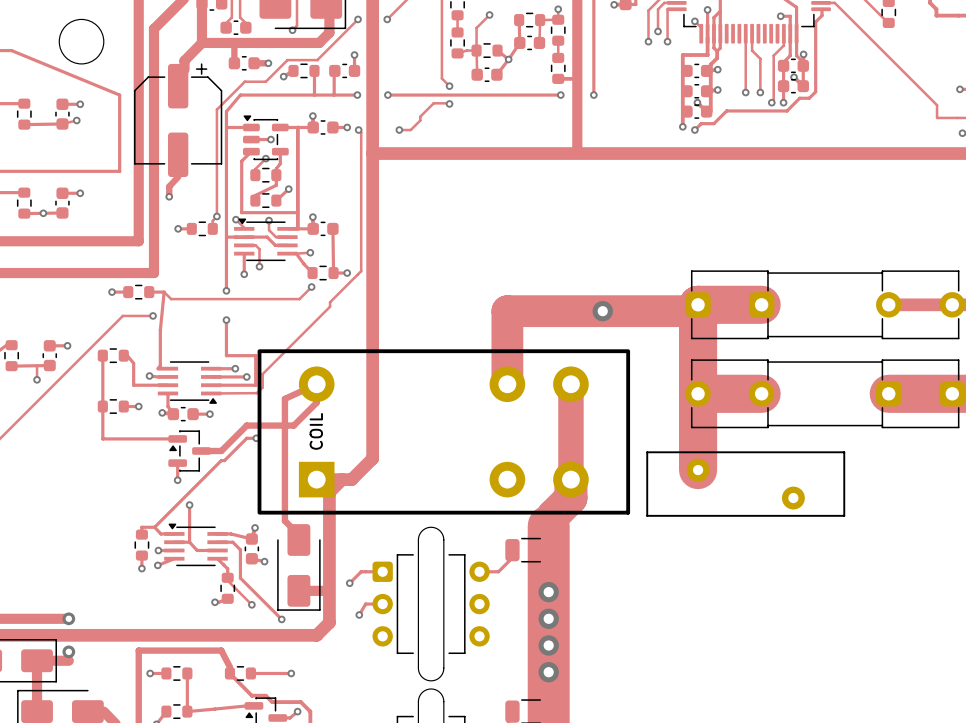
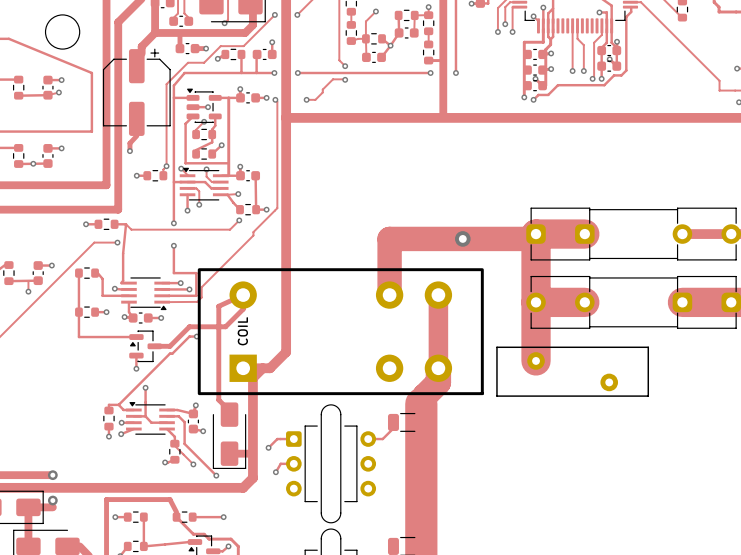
via: (548, 592) -> none
via: (548, 618) -> none
via: (548, 645) -> none
via: (548, 672) -> none

